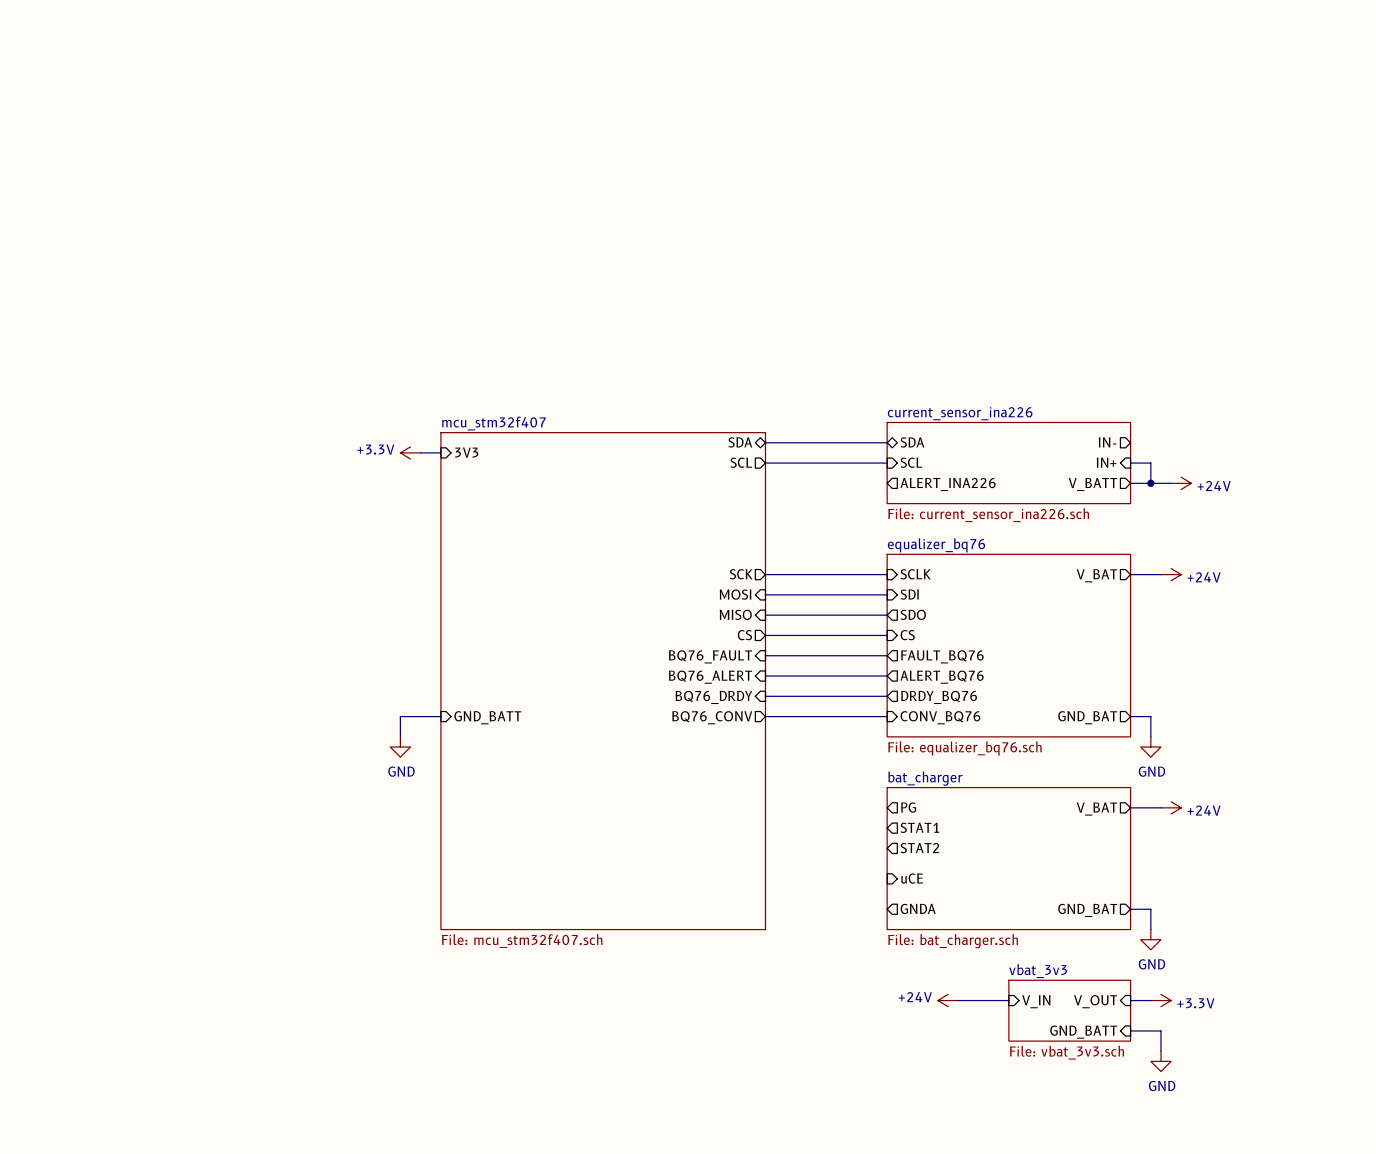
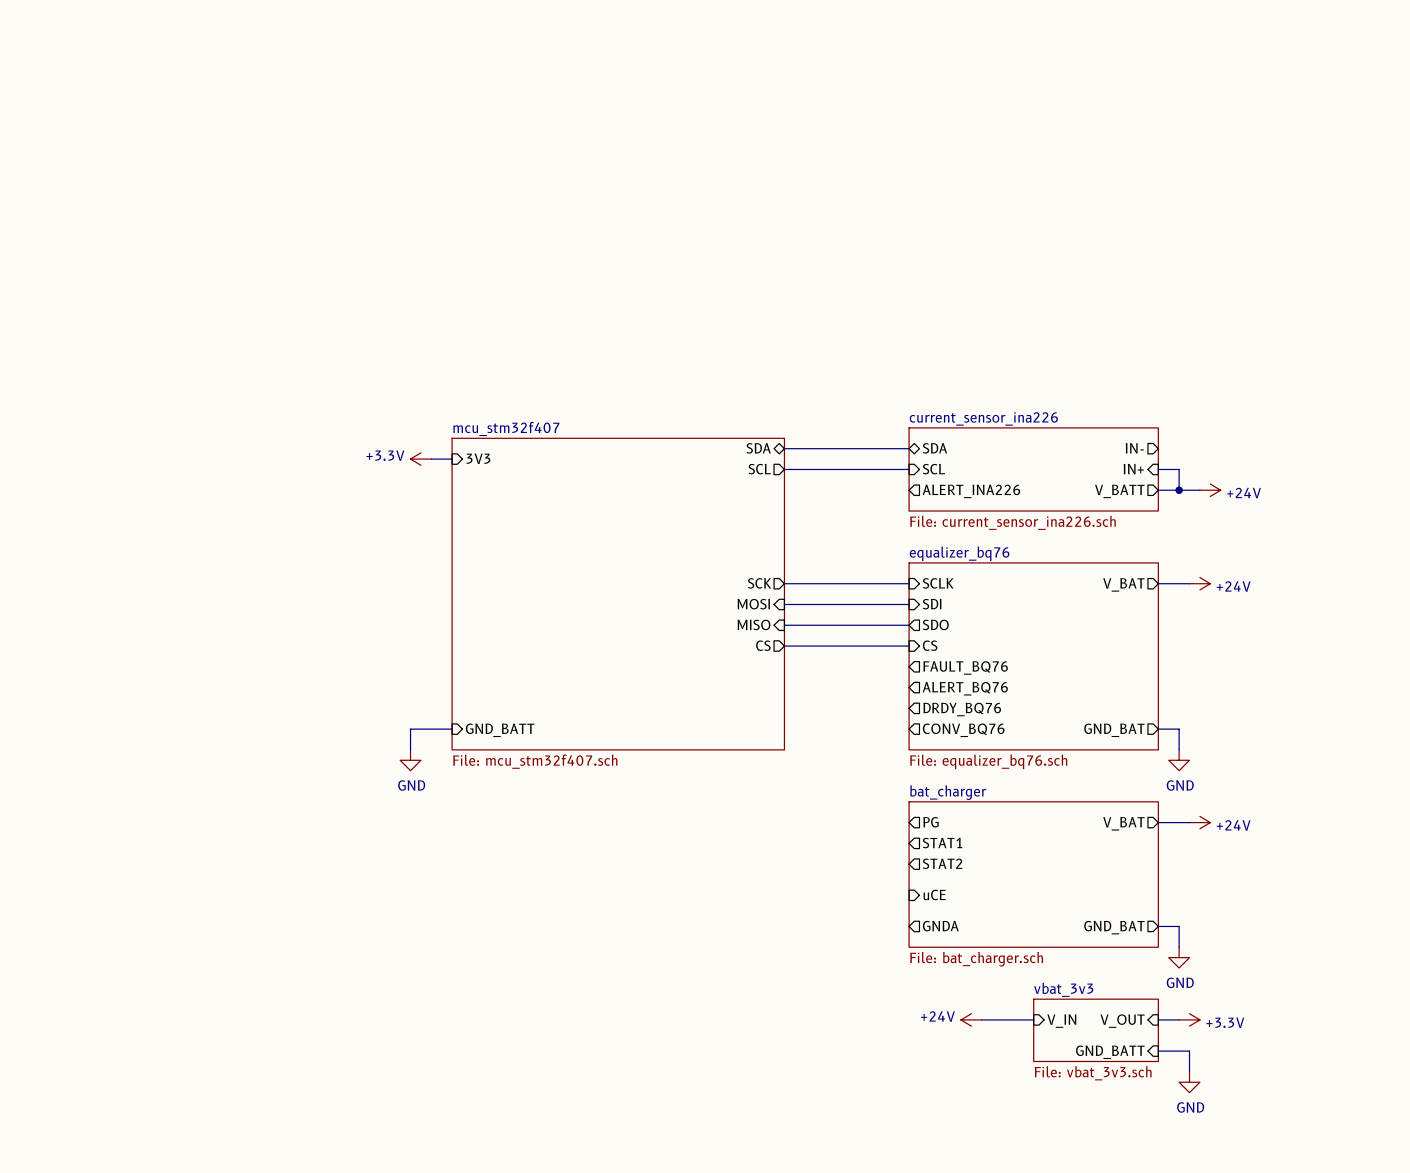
sheet mcu_stm32f407 shape: [440, 432, 766, 930] -> [452, 438, 785, 750]
wire: (765, 655) (887, 655) -> none
sheet pin: BQ76_FAULT (710, 656) -> none
wire: (765, 676) (887, 676) -> none
sheet pin: BQ76_ALERT (710, 677) -> none
wire: (765, 696) (887, 696) -> none
sheet pin: BQ76_DRDY (713, 697) -> none
wire: (765, 716) (887, 716) -> none
sheet pin: BQ76_CONV (712, 717) -> none
sheet pin shape: input (940, 717) -> output (963, 730)
sheet mcu_stm32f407 value position: File: mcu_stm32f407.sch (522, 941) -> File: mcu_stm32f407.sch (535, 761)

